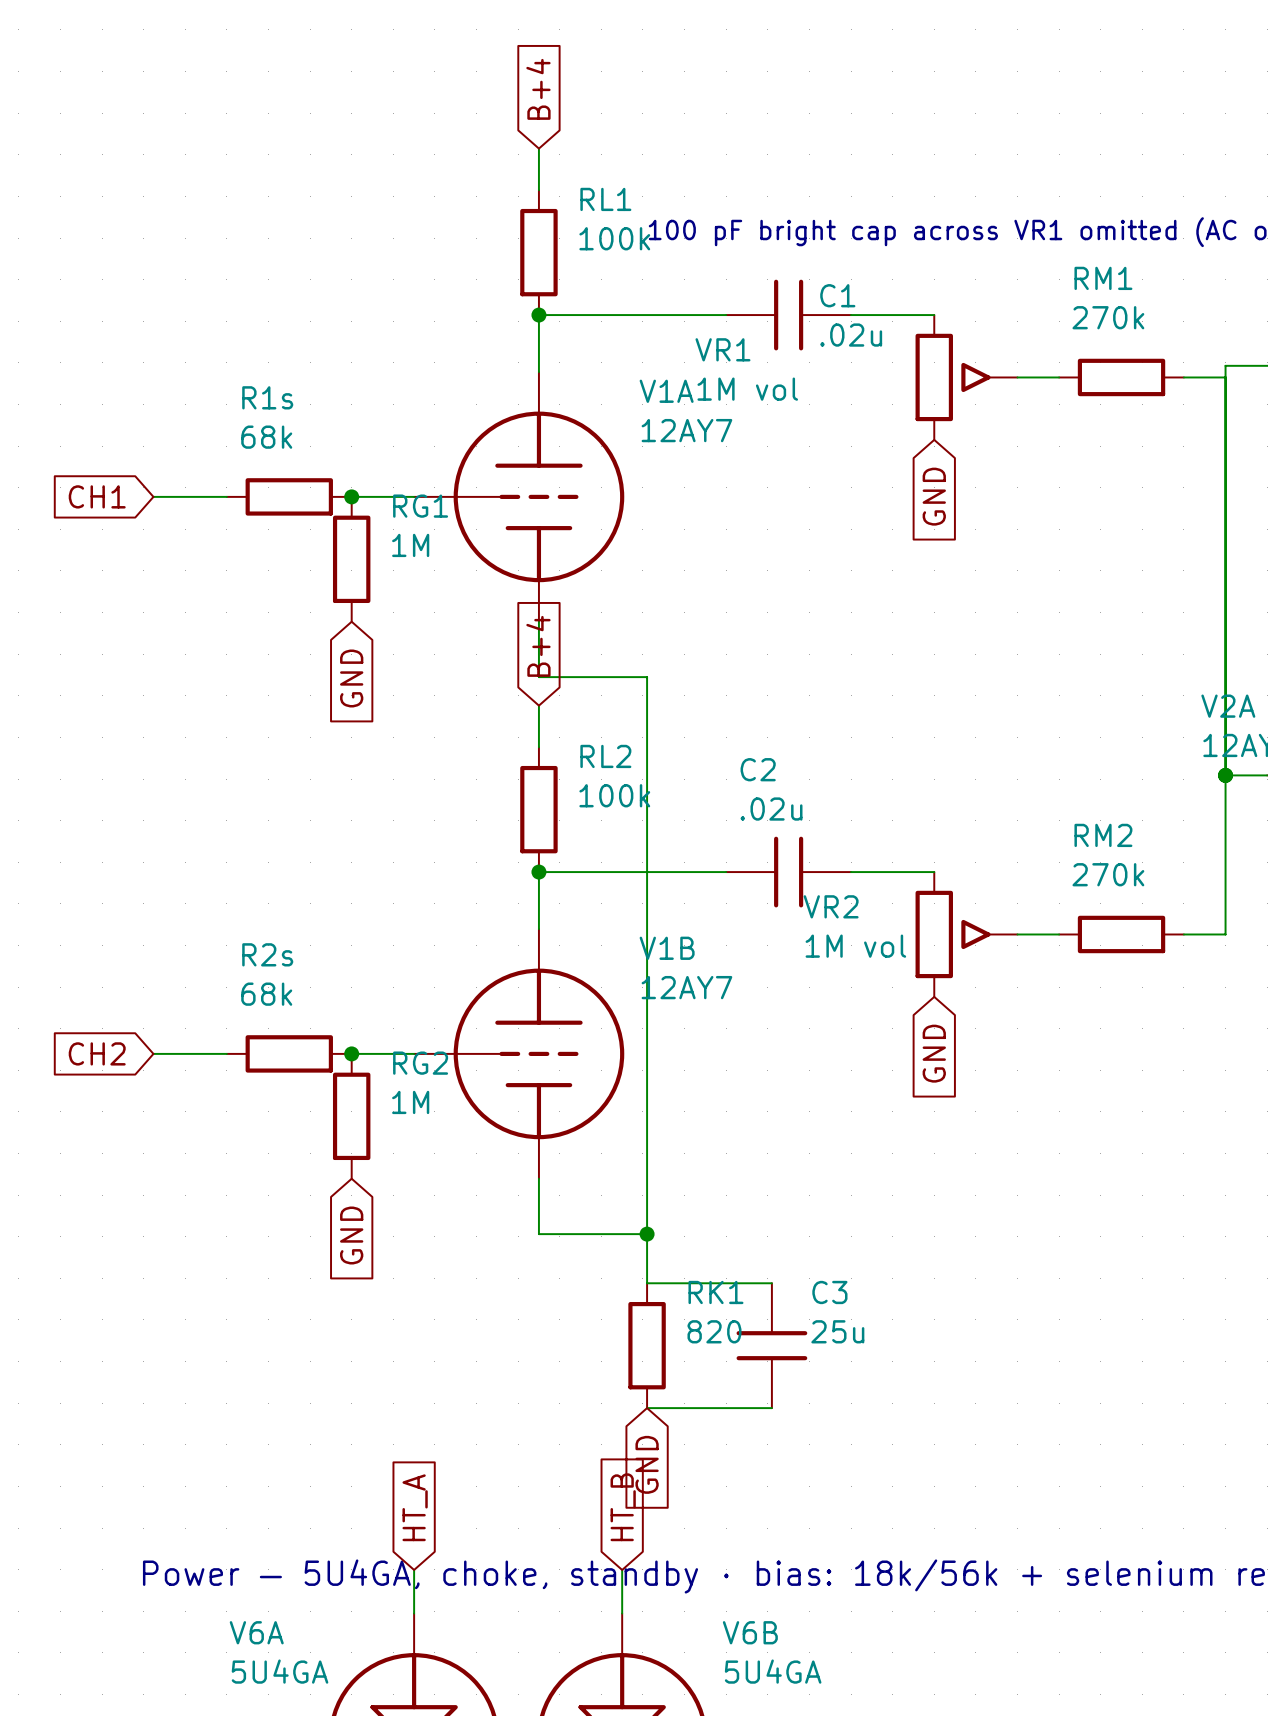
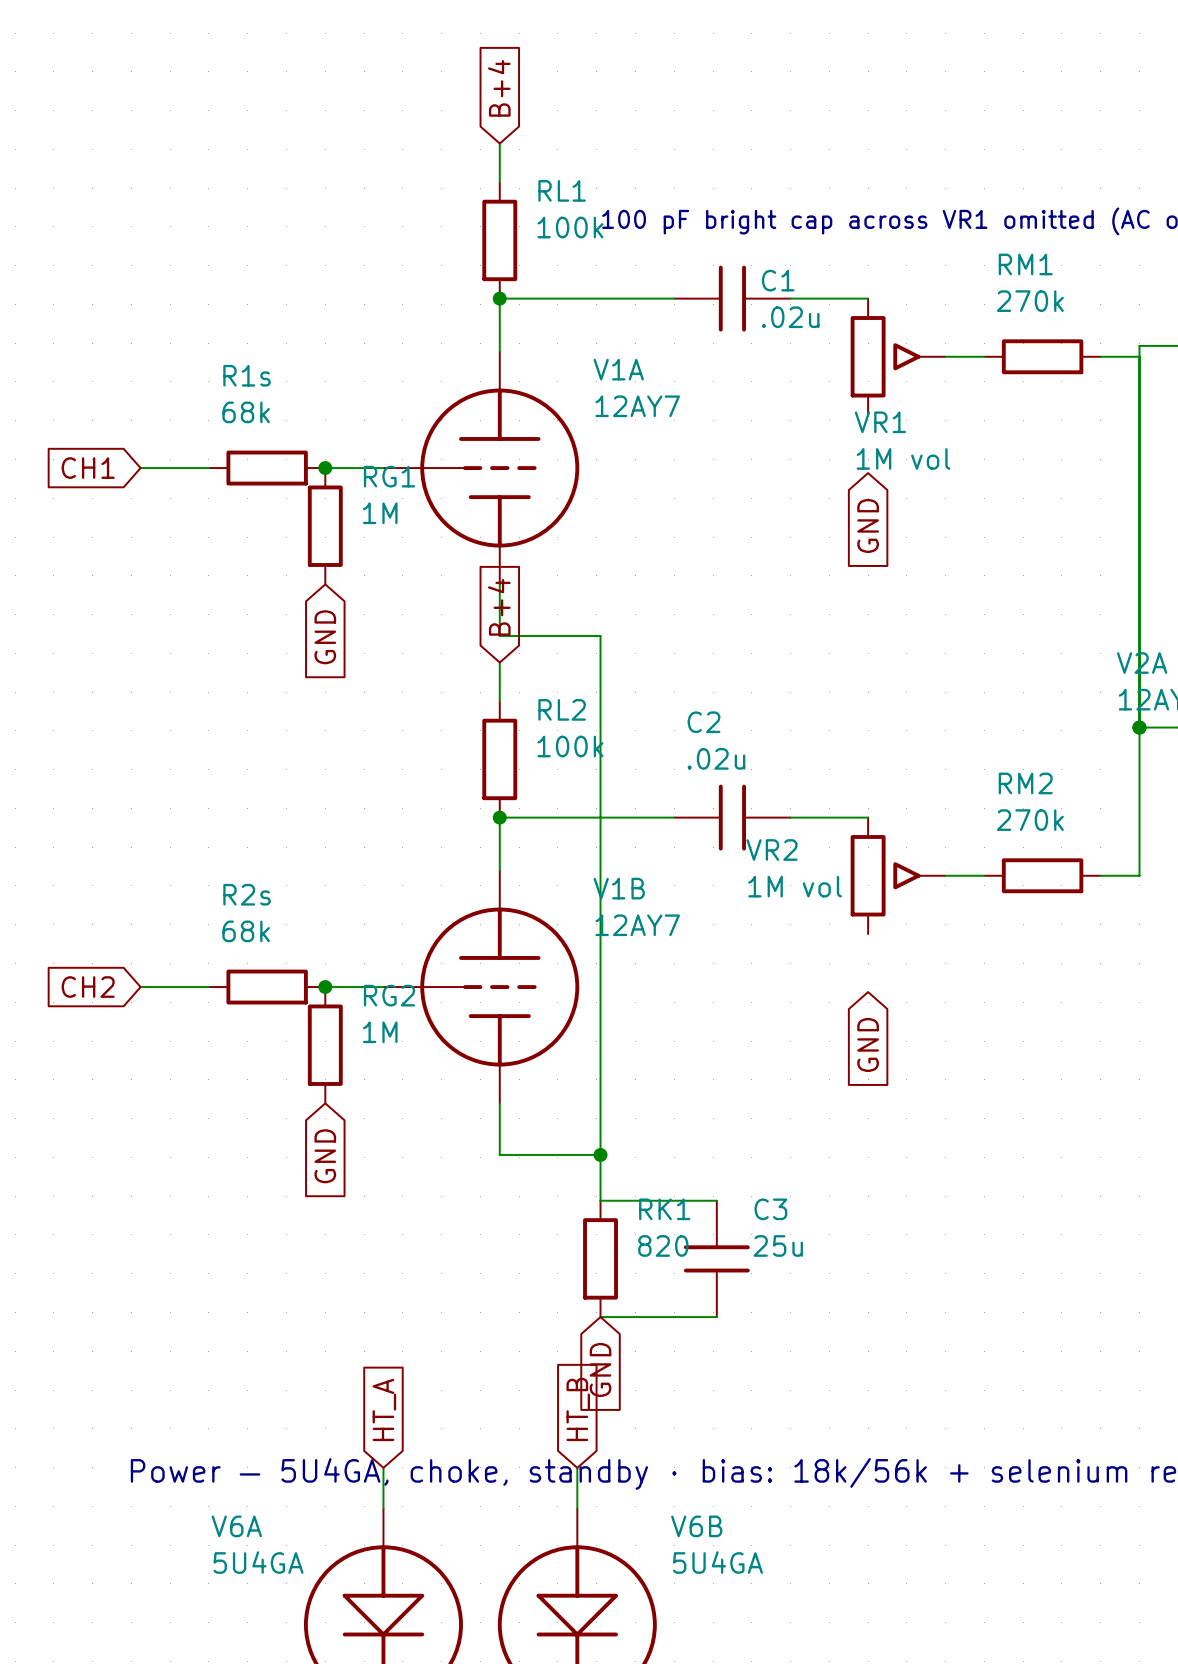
VR1 name position: VR1 (722, 349) -> VR1 (880, 422)
VR1 value position: 1M vol (747, 389) -> 1M vol (903, 458)
global label position: GND (934, 496) -> GND (868, 525)
global label position: GND (934, 1053) -> GND (868, 1044)

